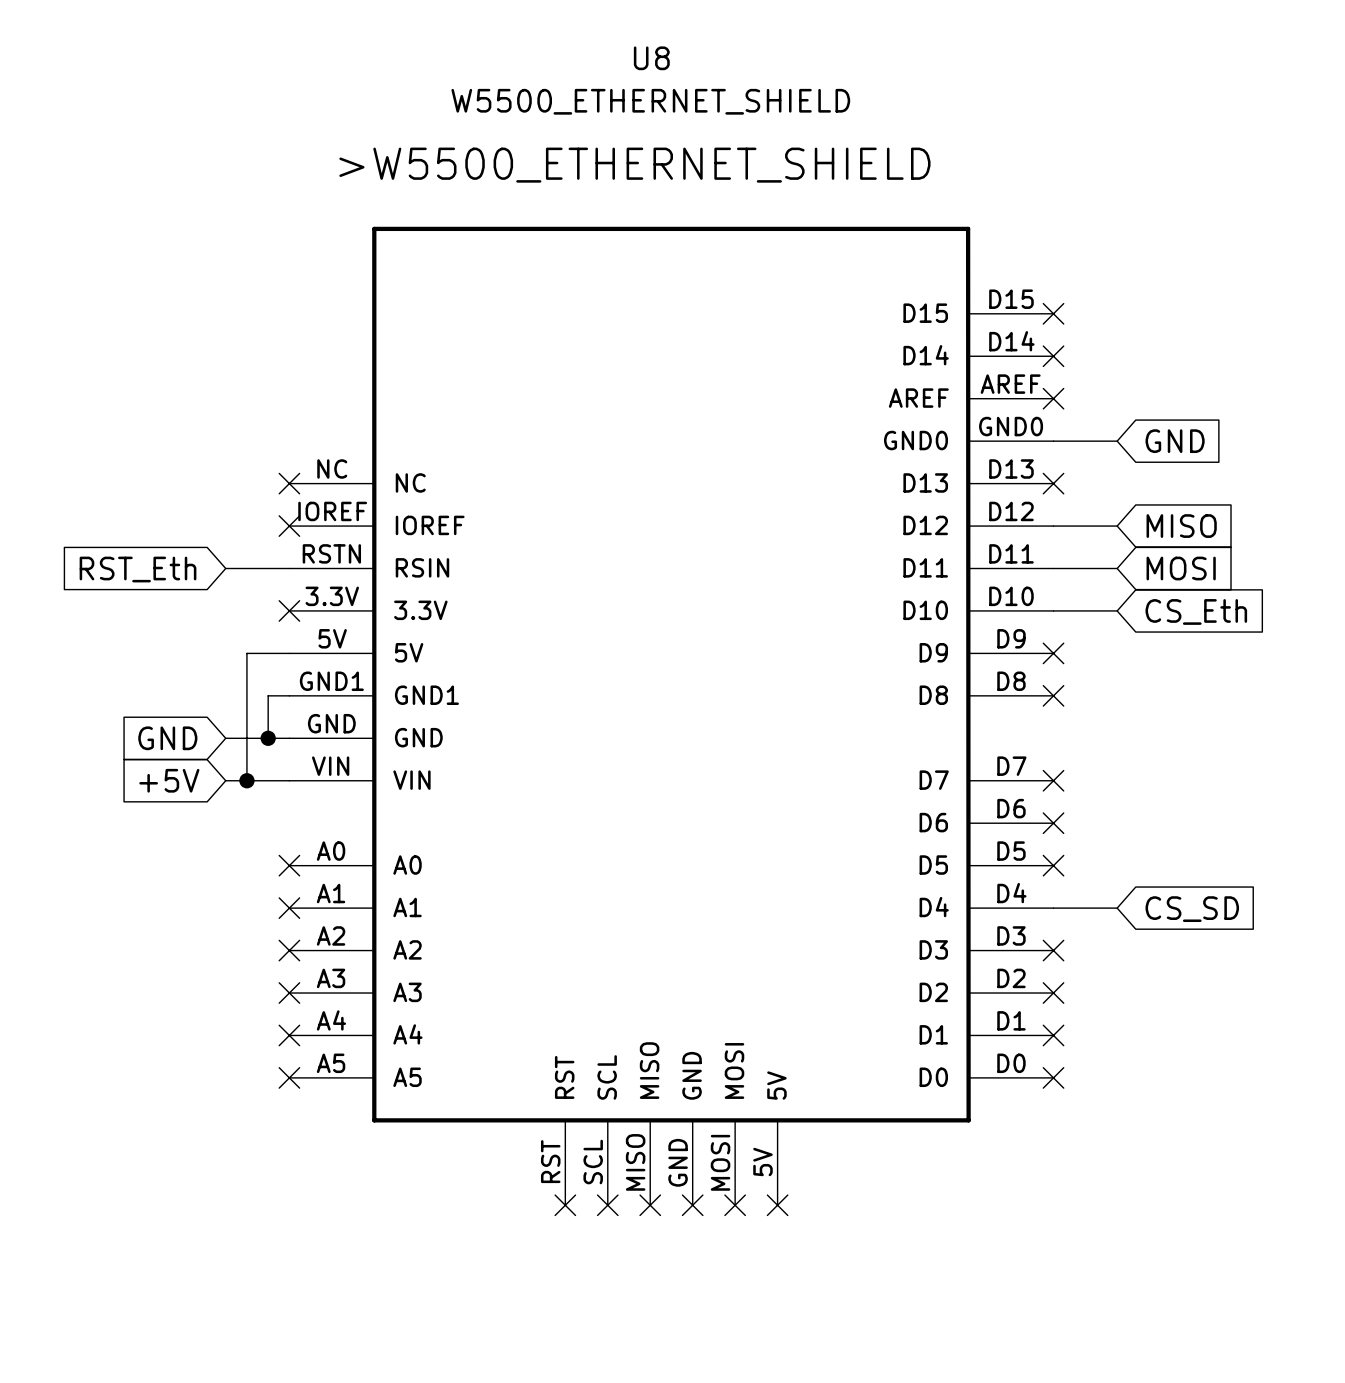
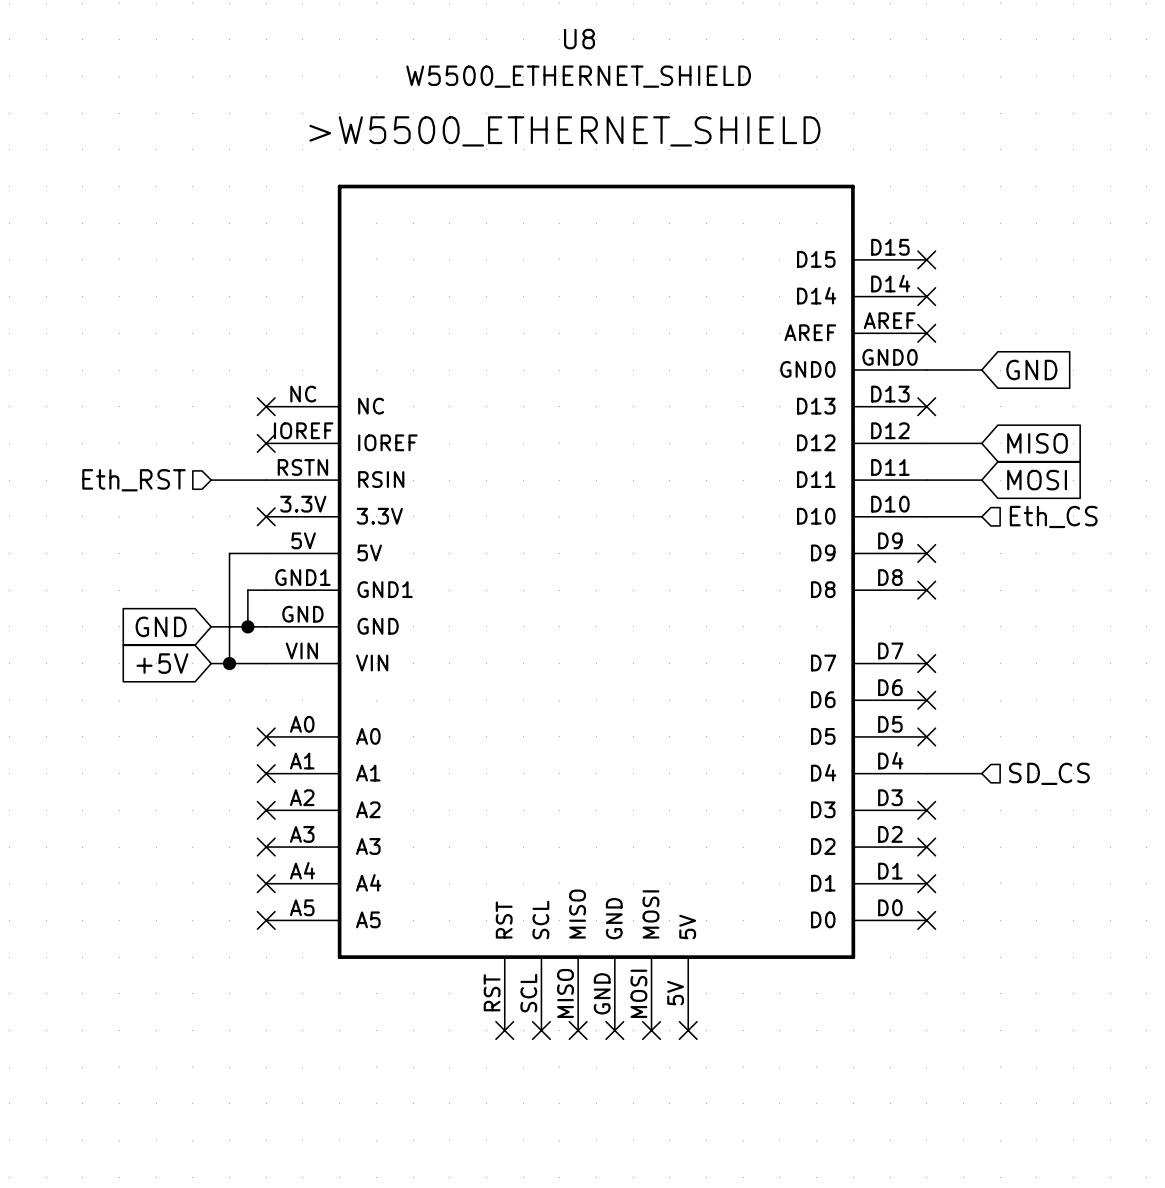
hierarchical label: none -> Eth_RST (134, 480)
global label: RST_Eth (138, 569) -> none
global label: CS_Eth (1196, 611) -> none
hierarchical label: none -> Eth_CS (1053, 516)
hierarchical label: none -> SD_CS (1049, 773)
global label: CS_SD (1192, 909) -> none

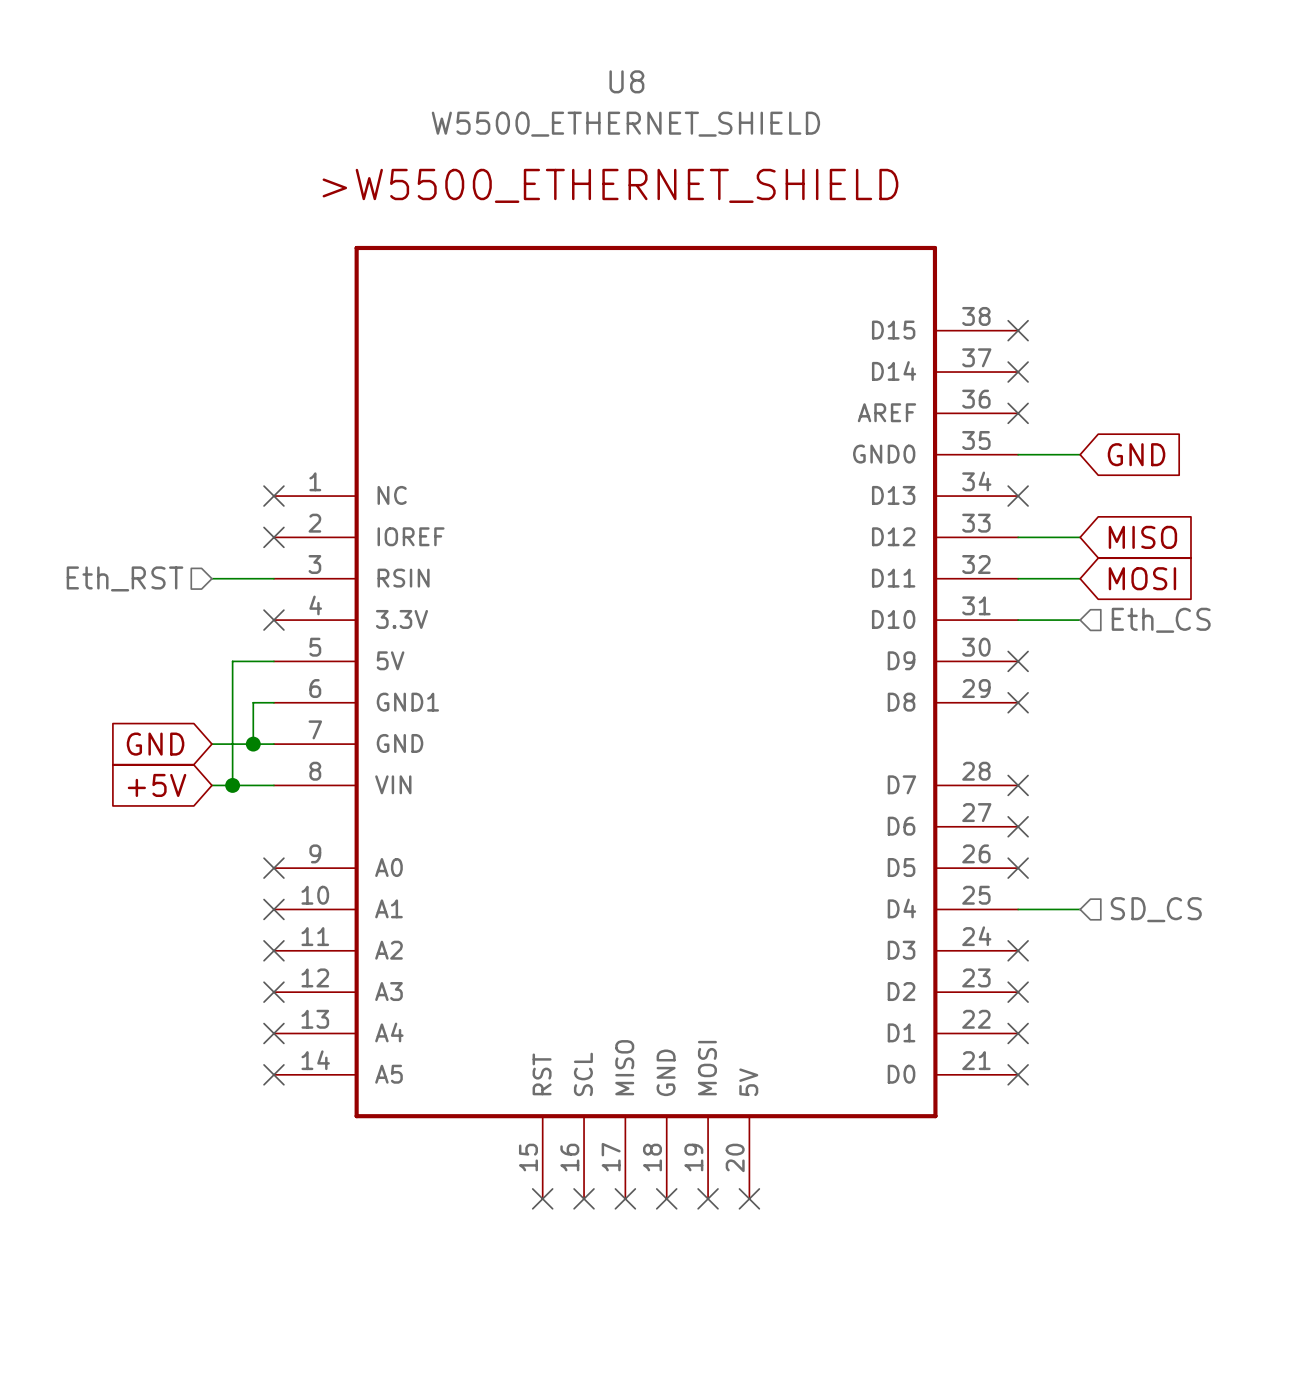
U8 symbol: [266, 184, 927, 1031] -> [273, 245, 1019, 1199]

